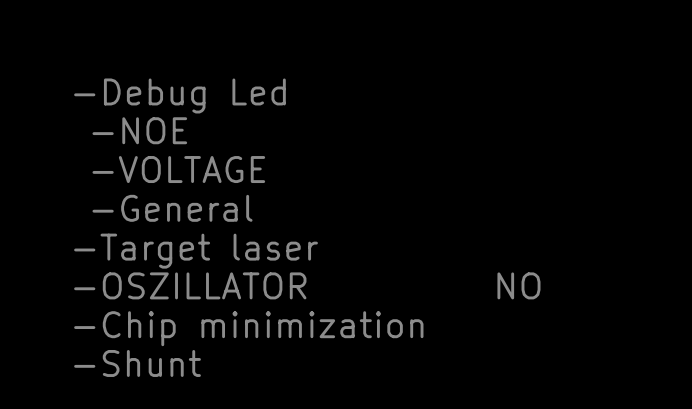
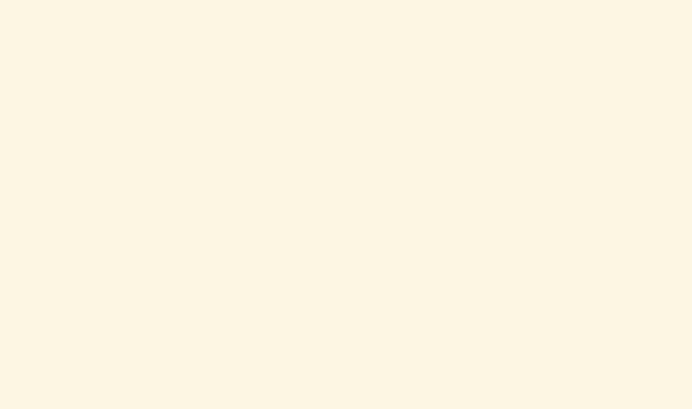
text: -Debug Led (179, 95) -> none
text: -NOE (139, 130) -> none
text: -VOLTAGE (178, 169) -> none
text: -General (172, 208) -> none
text: -Target laser (196, 251) -> none
text: -OSZILLATOR NO (307, 285) -> none
text: -Chip minimization (248, 328) -> none
text: -Shunt (137, 363) -> none

